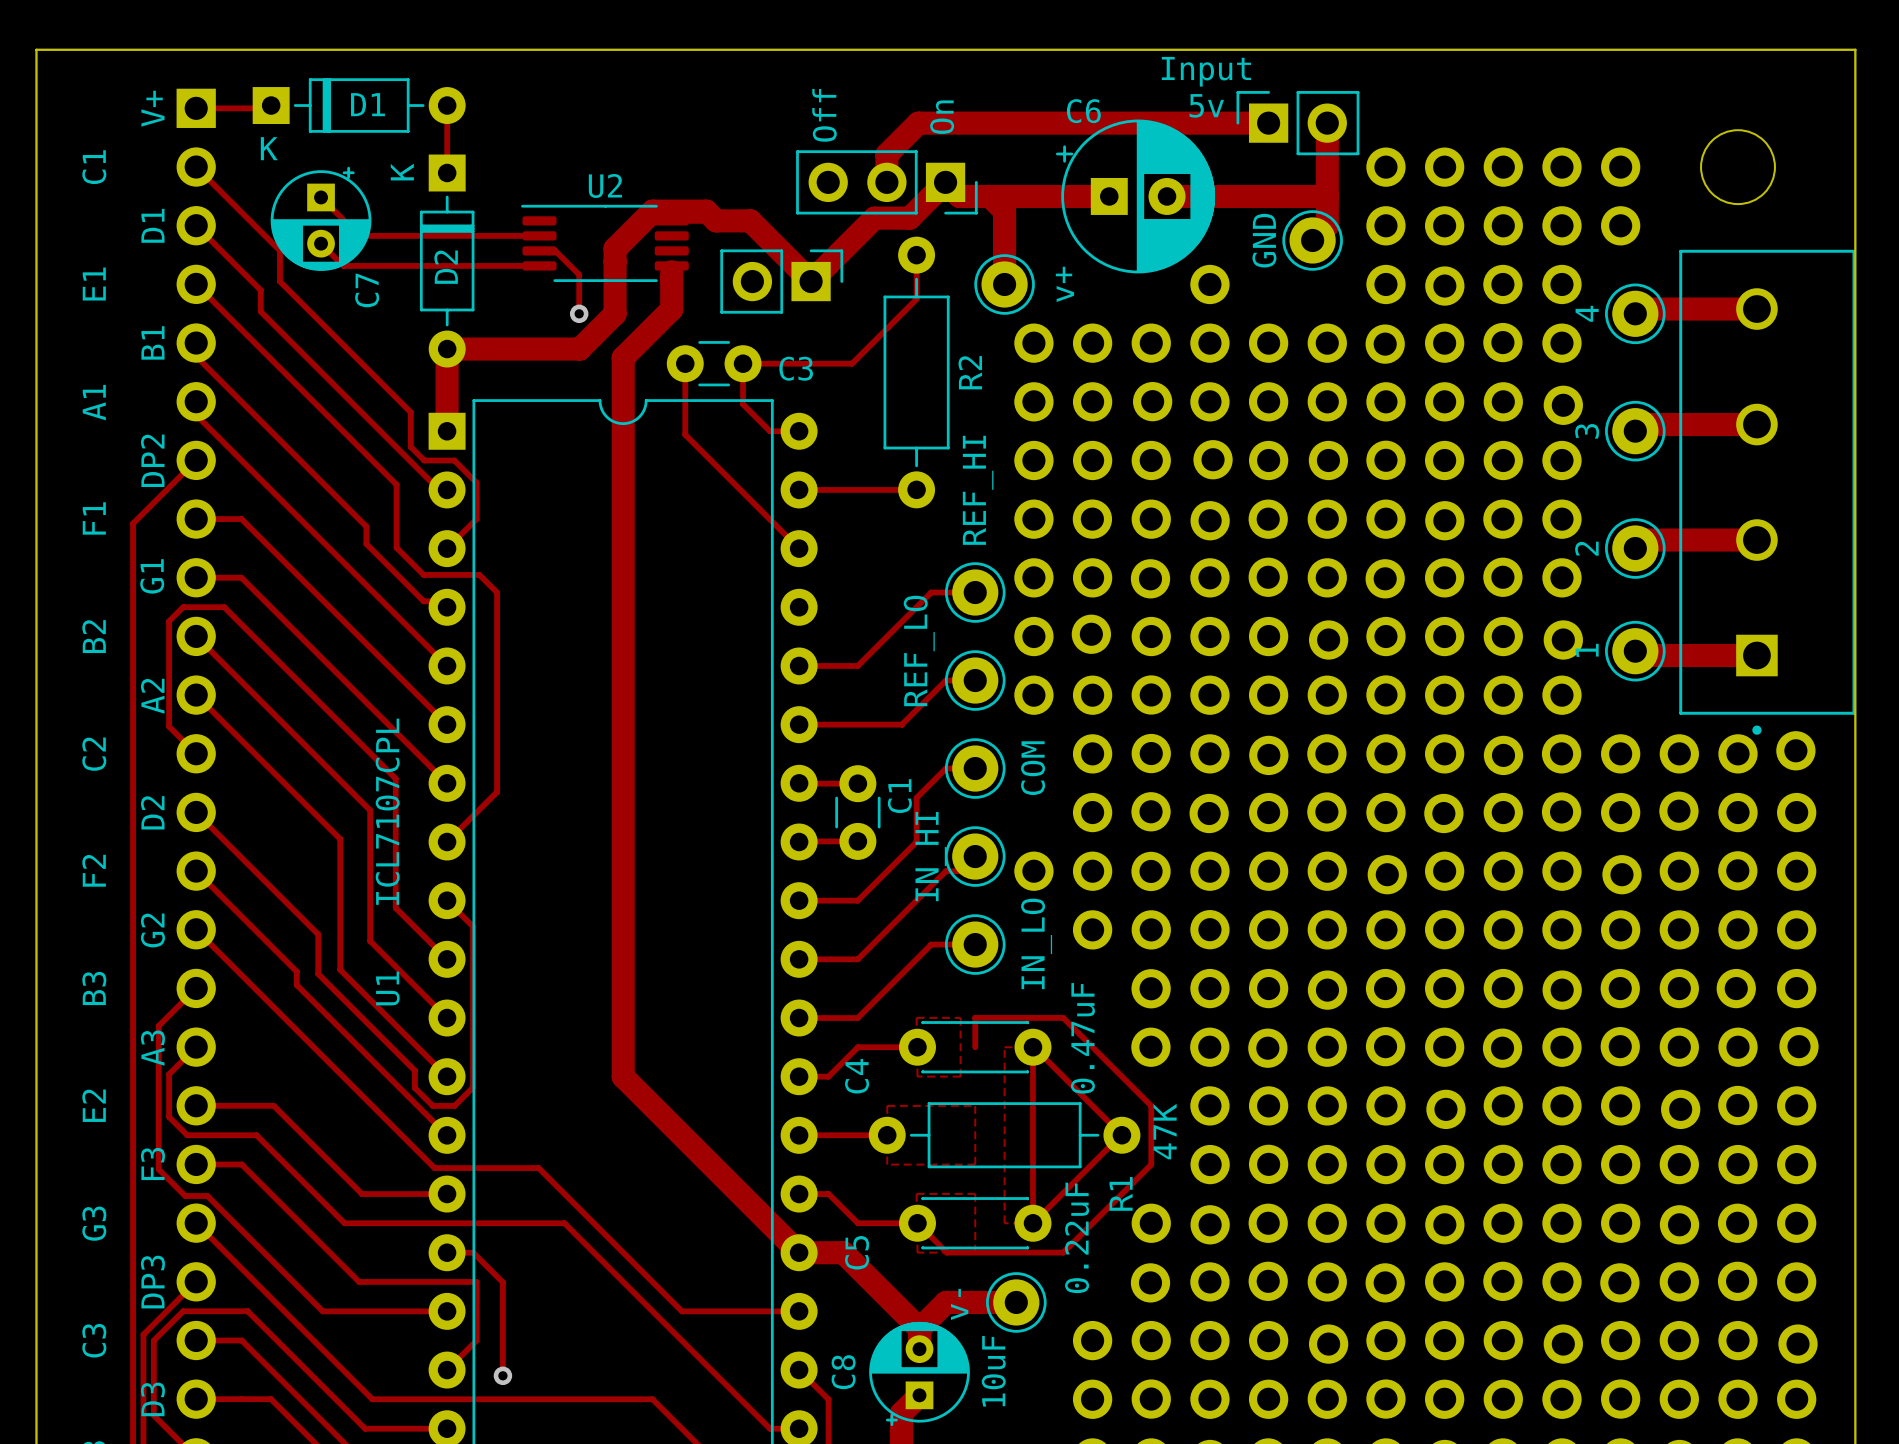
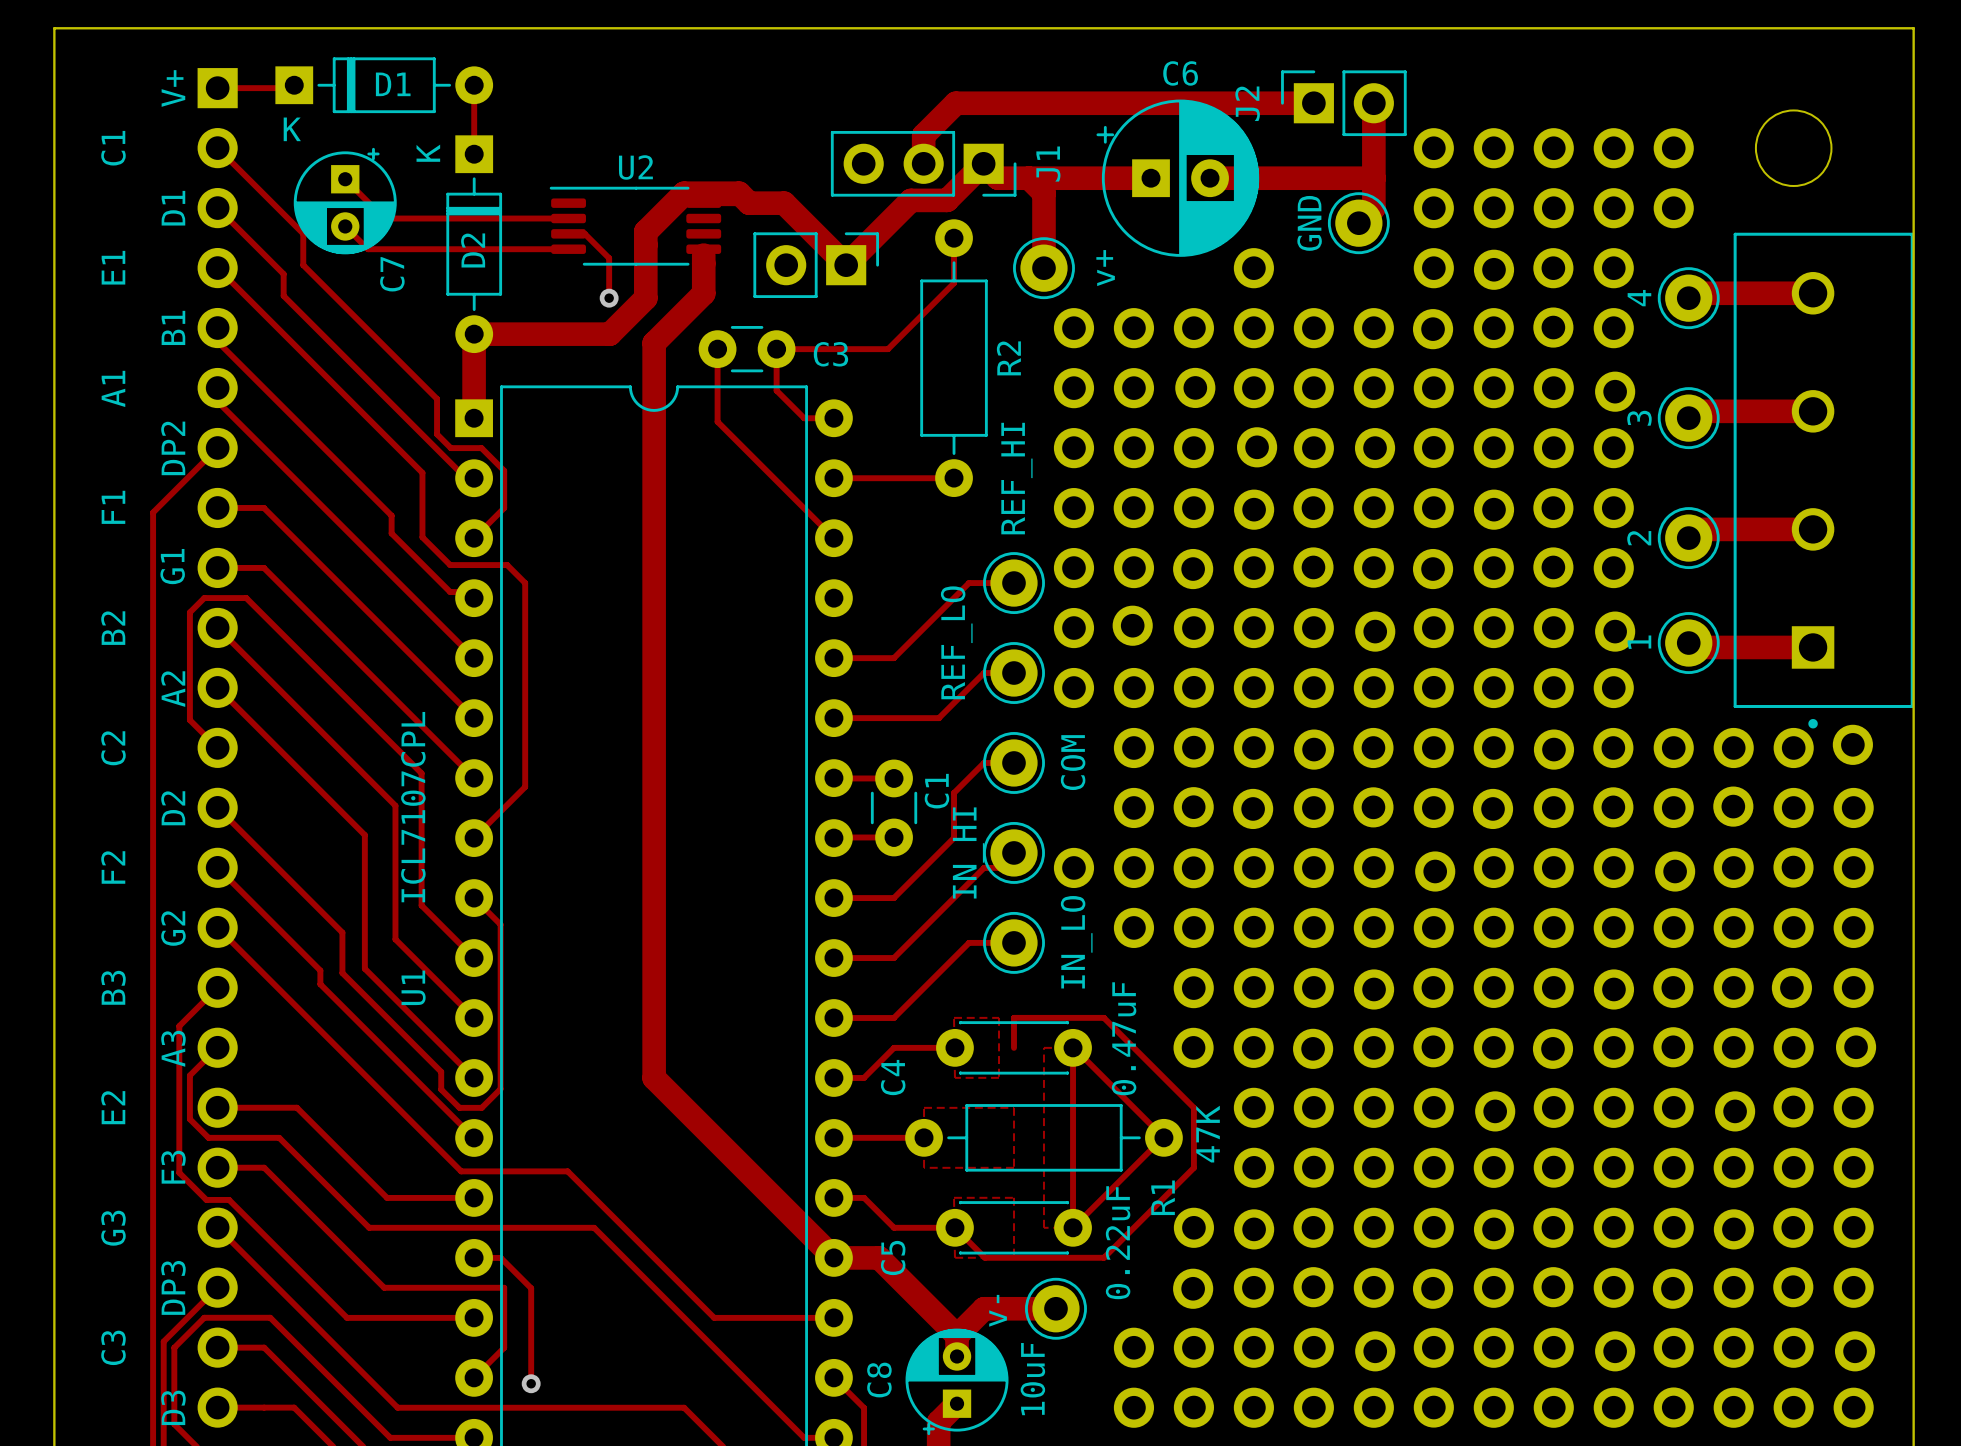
text: Input (1206, 71) -> none
text: 5v (1206, 105) -> none
C6 name position: C6 (1083, 111) -> C6 (1180, 73)
text: Off (824, 115) -> none
text: On (942, 117) -> none
J2 name: none -> J2 (1247, 103)
J1 name: none -> J1 (1048, 164)

